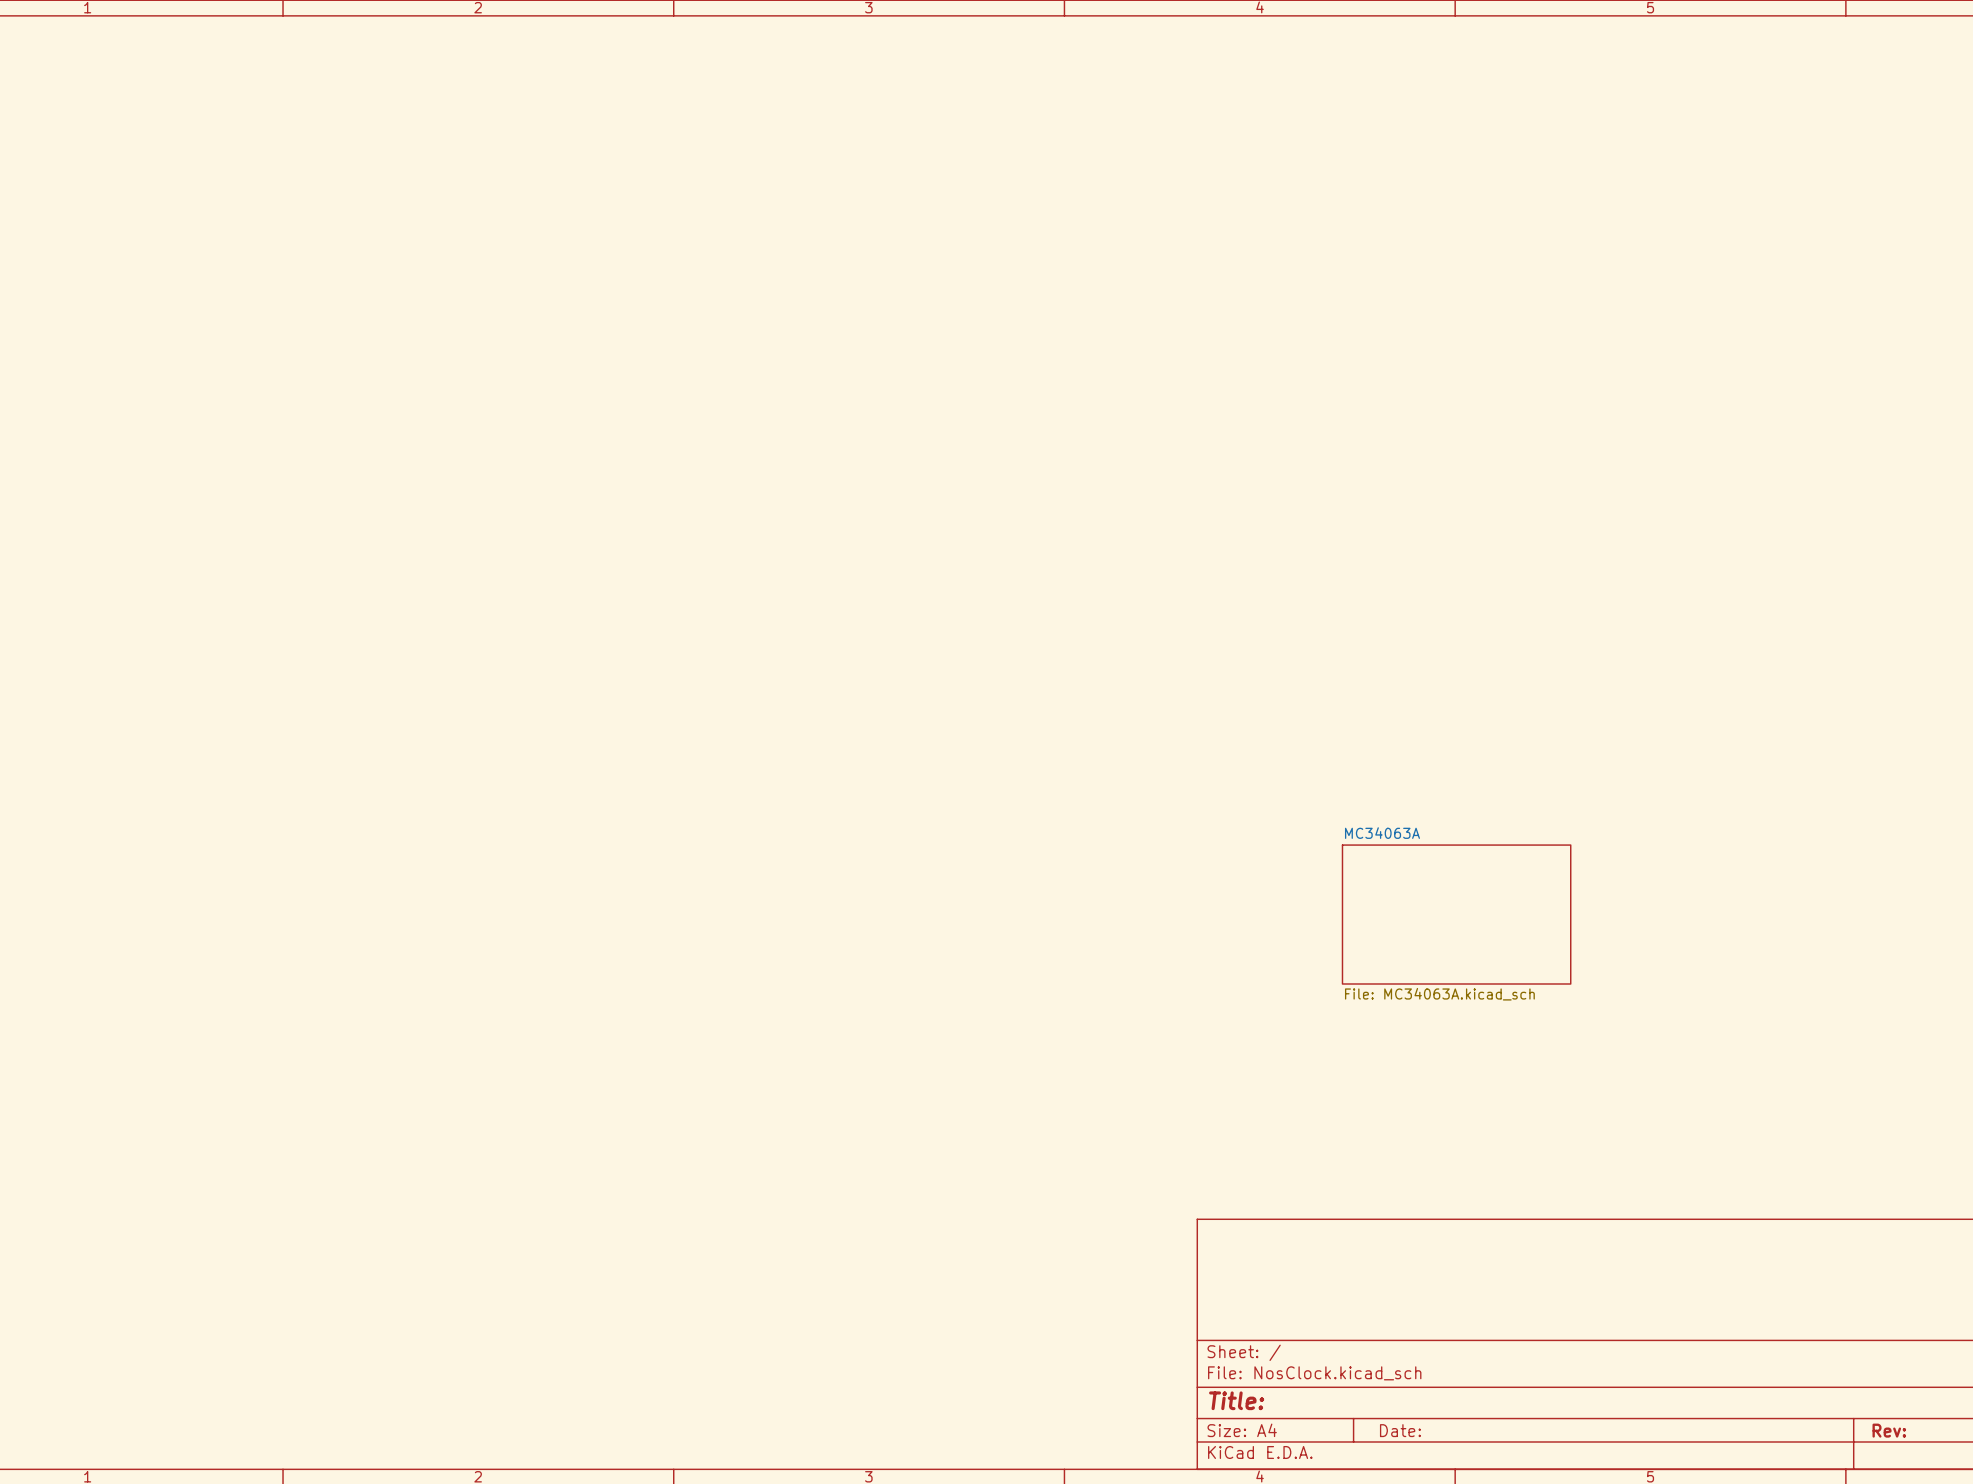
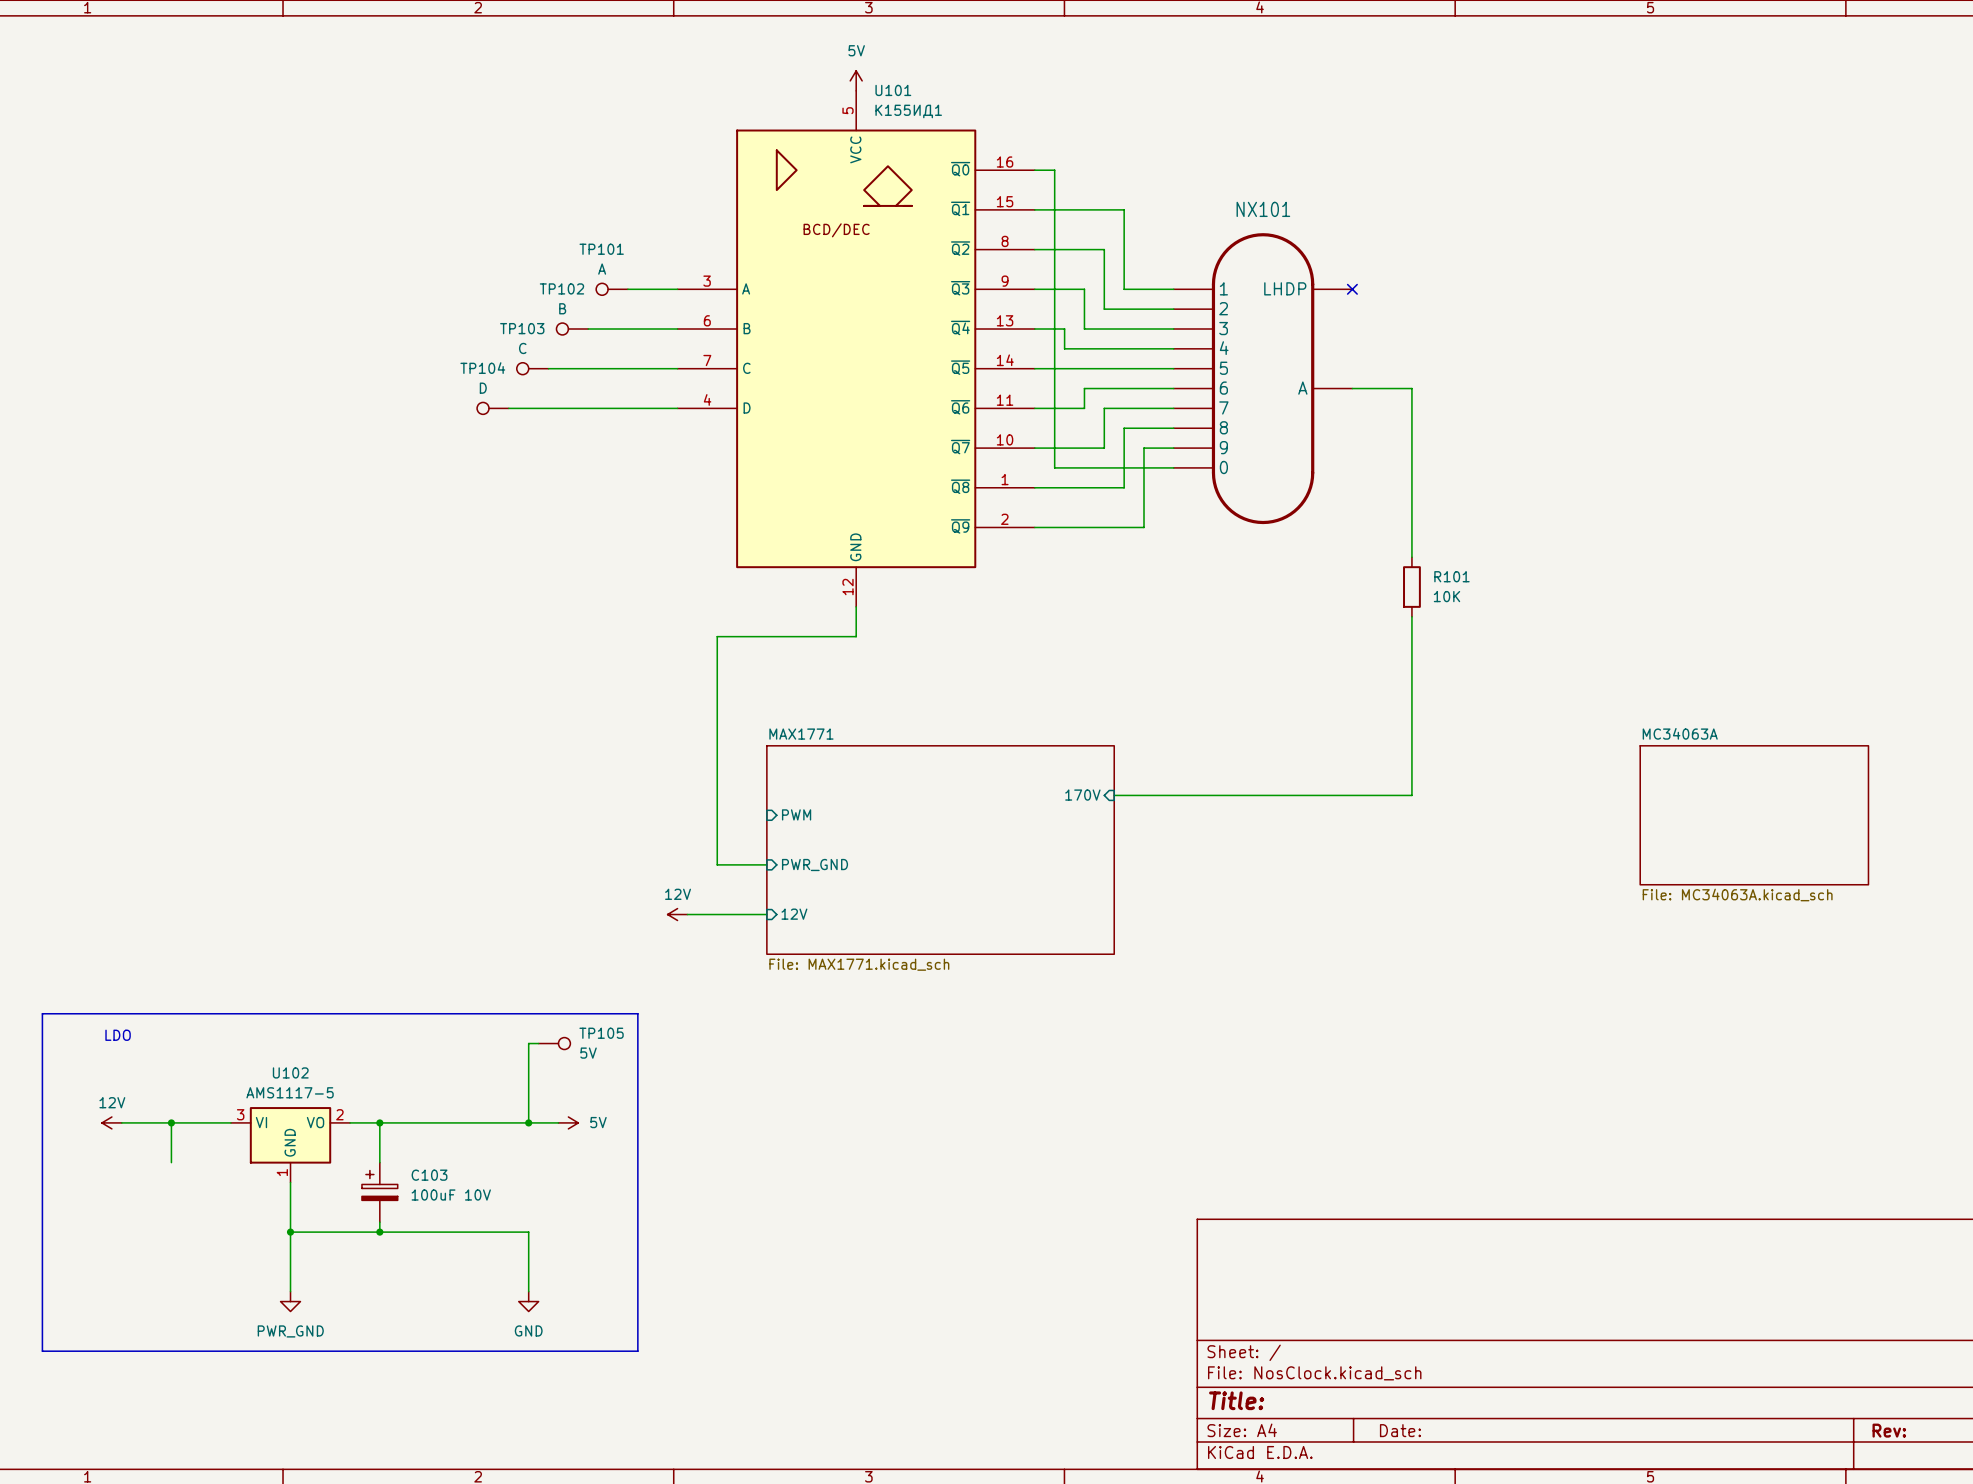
power symbol: none -> 5V (856, 80)
wire: none -> (1034, 170) (1054, 170) (1054, 467) (1173, 467)
wire: none -> (1034, 209) (1124, 209) (1124, 289) (1173, 289)
wire: none -> (1034, 249) (1104, 249) (1104, 309) (1173, 309)
TP101: none -> A (612, 289)
wire: none -> (627, 289) (677, 289)
wire: none -> (1034, 289) (1084, 289) (1084, 328) (1173, 328)
no-connect mark: none -> (1352, 289)
TP102: none -> B (572, 328)
wire: none -> (588, 328) (677, 328)
wire: none -> (1034, 328) (1064, 328) (1064, 348) (1173, 348)
U101: none -> К155ИД1 (856, 348)
TP103: none -> C (532, 368)
wire: none -> (548, 368) (677, 368)
wire: none -> (1034, 368) (1173, 368)
NX101: none -> (1263, 378)
wire: none -> (1173, 388) (1084, 388) (1084, 408) (1034, 408)
wire: none -> (1352, 388) (1411, 388) (1411, 557)
TP104: none -> D (492, 408)
wire: none -> (508, 408) (677, 408)
wire: none -> (1173, 408) (1104, 408) (1104, 448) (1034, 448)
wire: none -> (1173, 428) (1124, 428) (1124, 487) (1034, 487)
wire: none -> (1173, 448) (1144, 448) (1144, 527) (1034, 527)
R101: none -> 10K (1411, 587)
wire: none -> (856, 606) (856, 636) (717, 636) (717, 864) (766, 864)
wire: none -> (1411, 616) (1411, 795) (1114, 795)
sheet pin: none -> 170V (1082, 795)
sheet pin: none -> PWM (796, 814)
sheet MAX1771: none -> File: MAX1771.kicad_sch (940, 850)
sheet pin: none -> PWR_GND (815, 865)
power symbol: none -> 12V (677, 914)
wire: none -> (687, 914) (766, 914)
sheet pin: none -> 12V (794, 914)
sheet MC34063A position: (1456, 914) -> (1754, 815)
line: none -> (42, 1013) (637, 1013) (637, 1351) (42, 1351) (42, 1013)
text: none -> LDO (118, 1035)
wire: none -> (538, 1043) (528, 1043) (528, 1122)
TP105: none -> 5V (554, 1043)
power symbol: none -> 12V (111, 1122)
wire: none -> (121, 1122) (230, 1122)
wire: none -> (171, 1122) (171, 1162)
junction: none -> (171, 1122)
wire: none -> (350, 1122) (558, 1122)
wire: none -> (379, 1122) (379, 1162)
junction: none -> (379, 1122)
junction: none -> (528, 1122)
power symbol: none -> 5V (568, 1122)
U102: none -> AMS1117-5 (290, 1144)
wire: none -> (290, 1182) (290, 1291)
C103: none -> 100uF 10V (379, 1192)
wire: none -> (379, 1222) (379, 1232)
wire: none -> (290, 1232) (528, 1232) (528, 1291)
junction: none -> (290, 1232)
junction: none -> (379, 1232)
power symbol: none -> PWR_GND (290, 1301)
power symbol: none -> GND (528, 1301)

